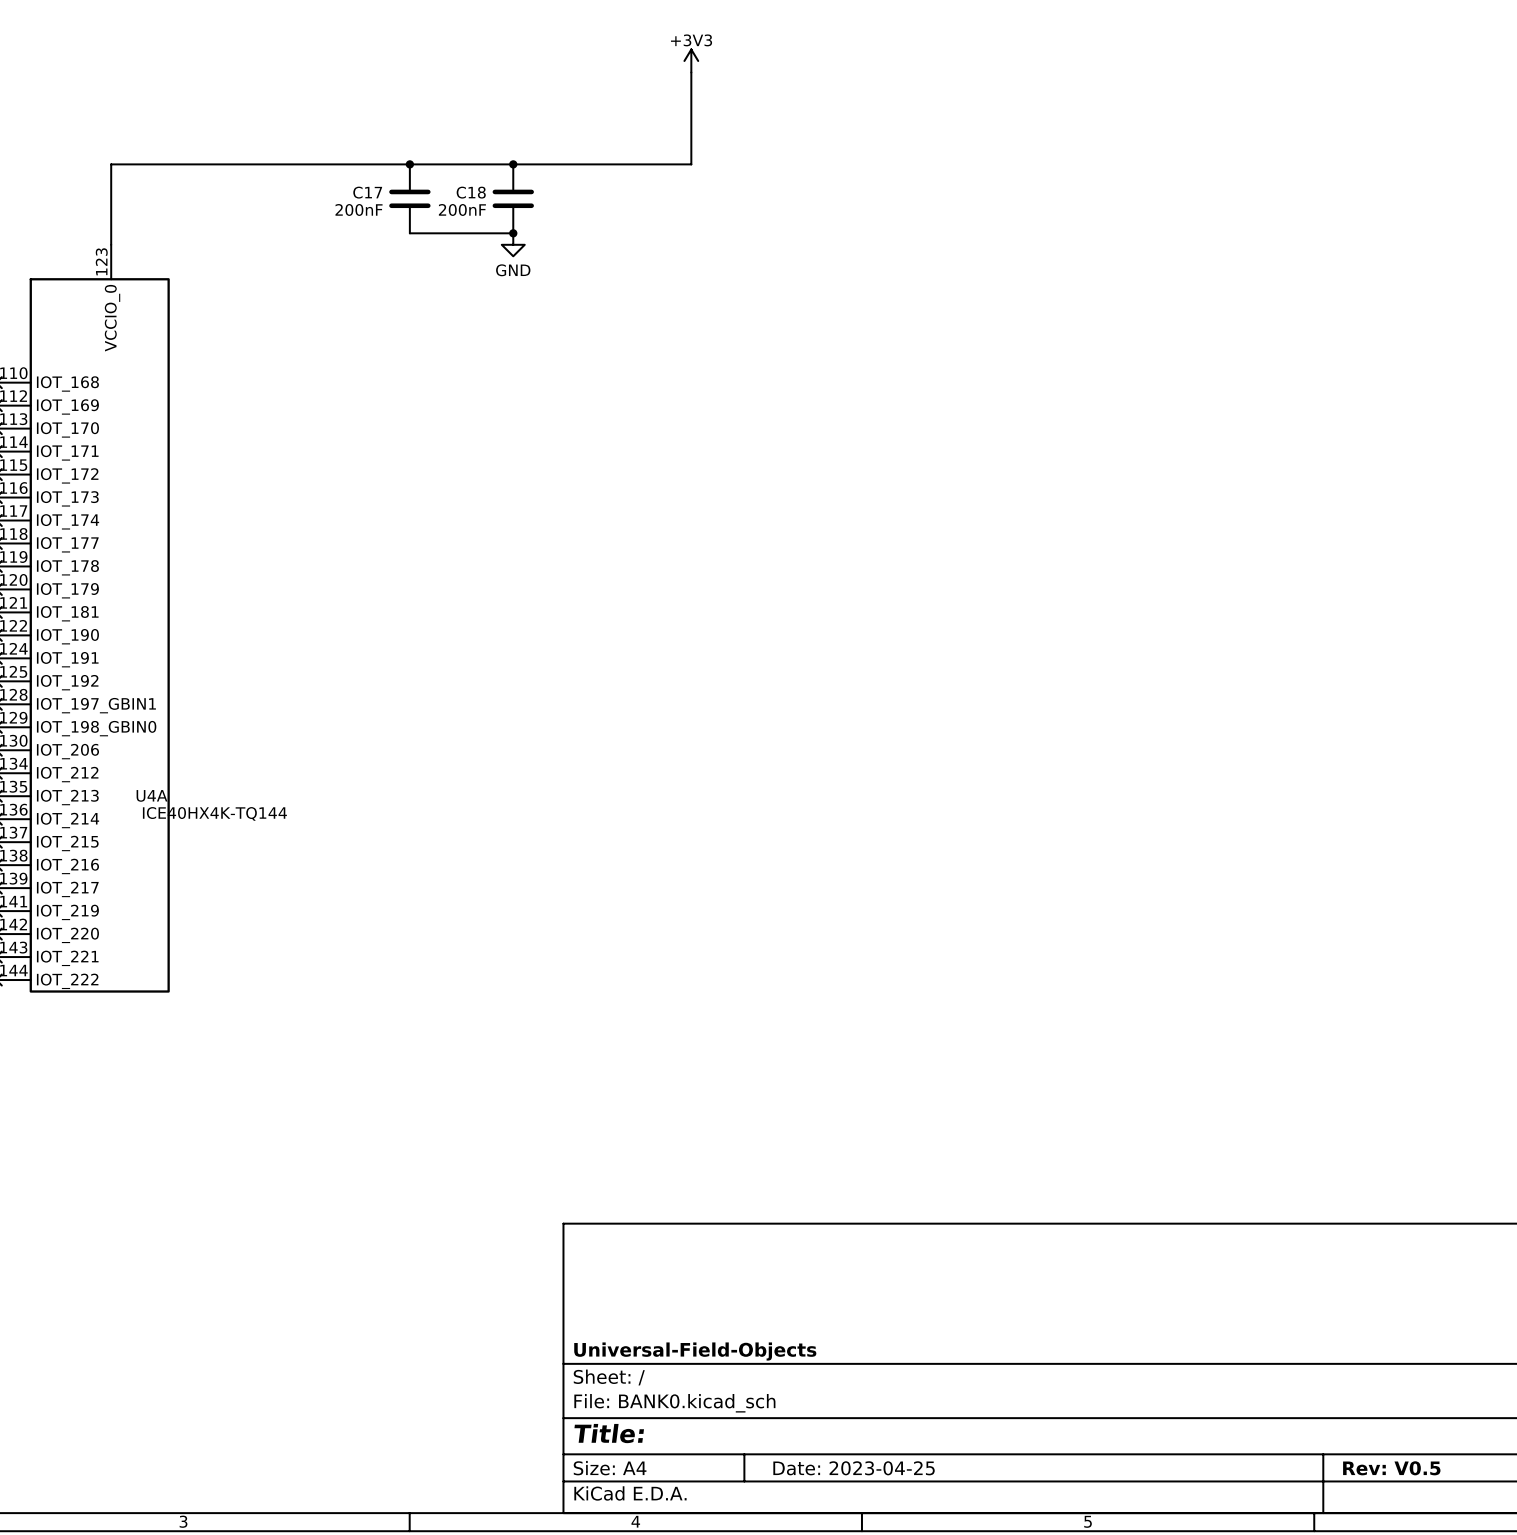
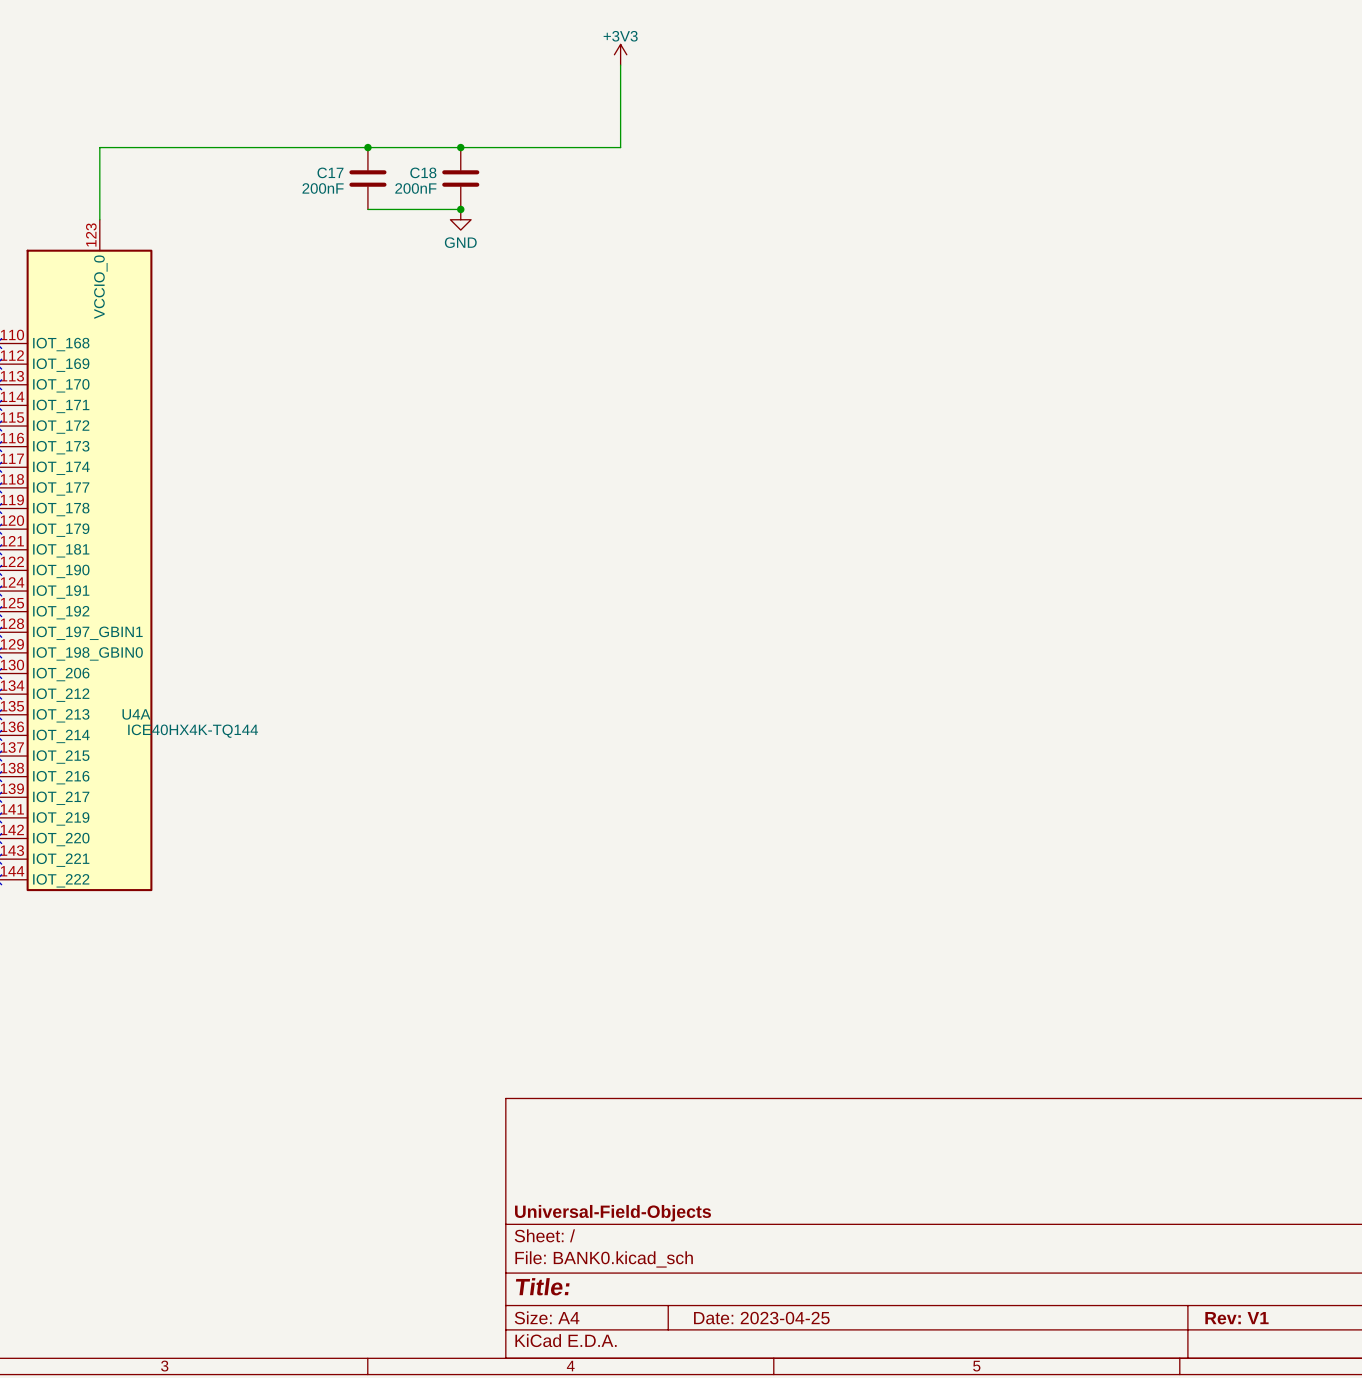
title block: Rev: V0.5 (1391, 1468) -> Rev: V1 (1236, 1318)

